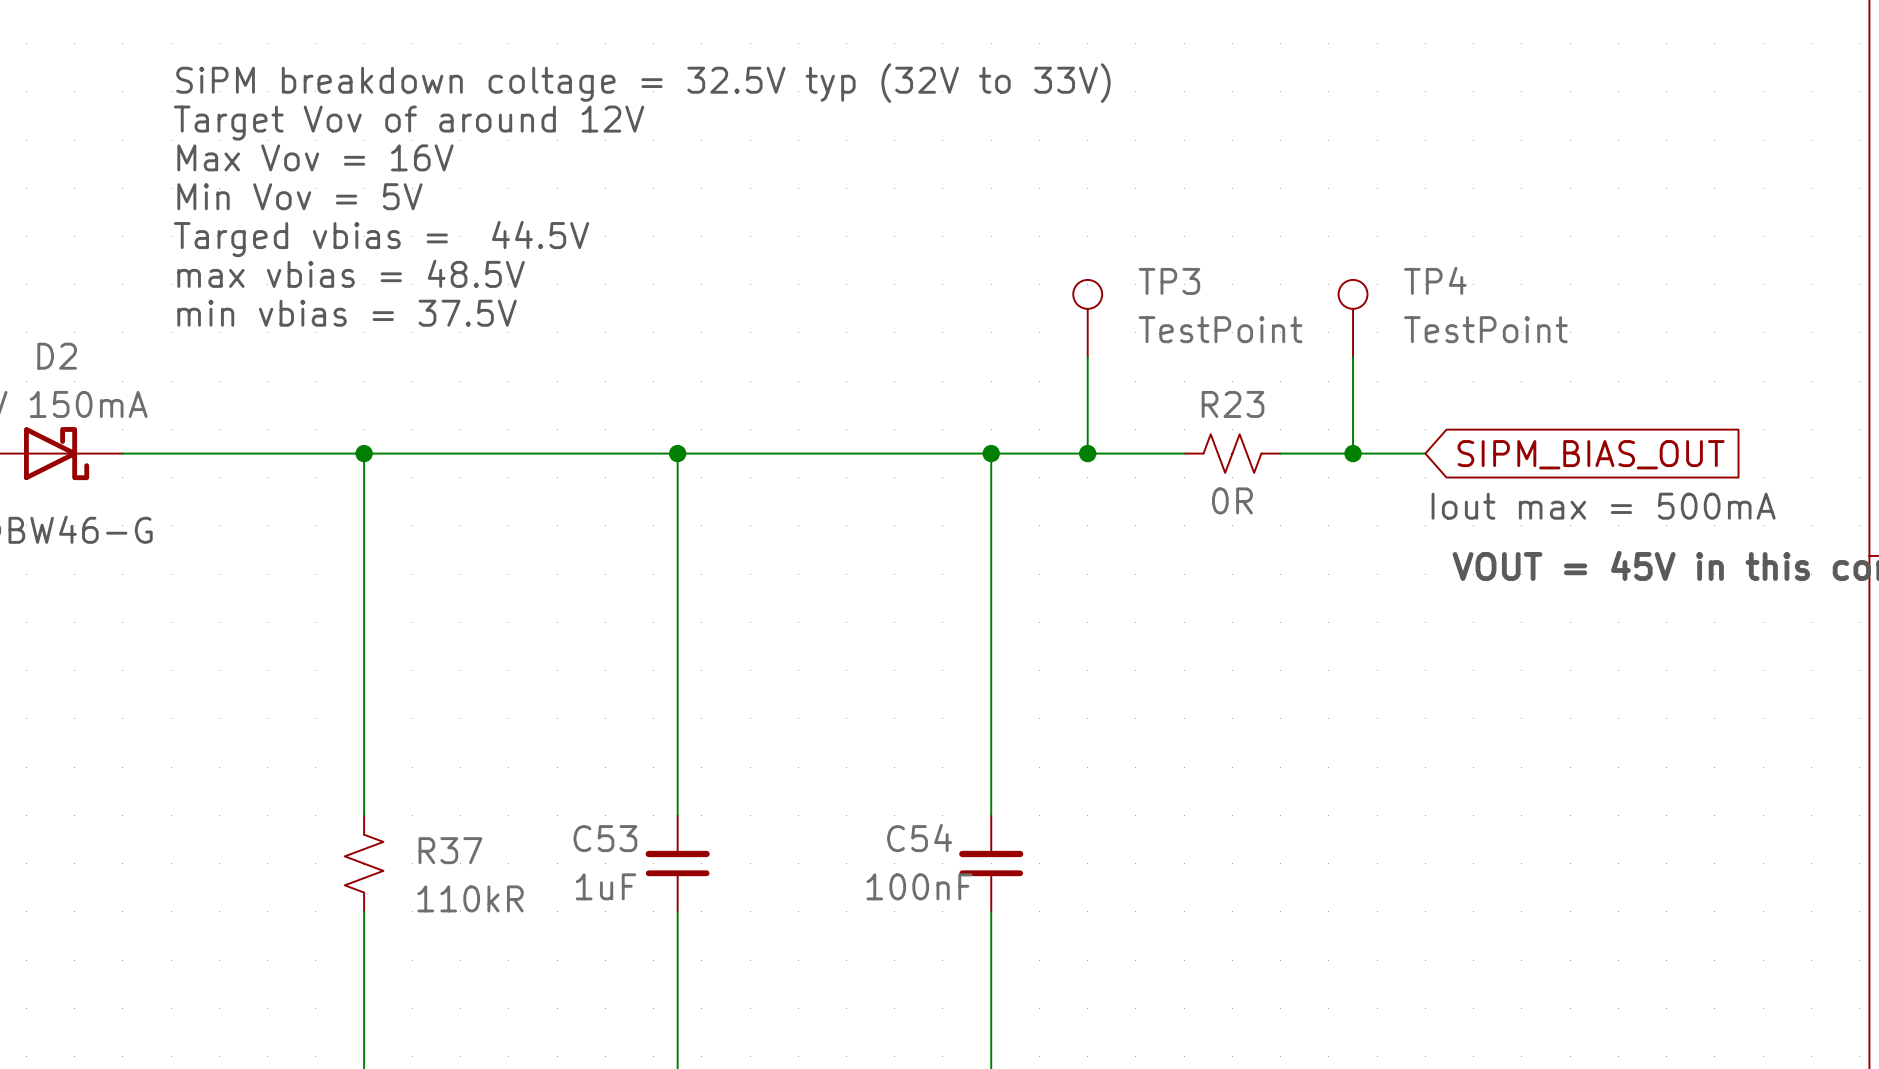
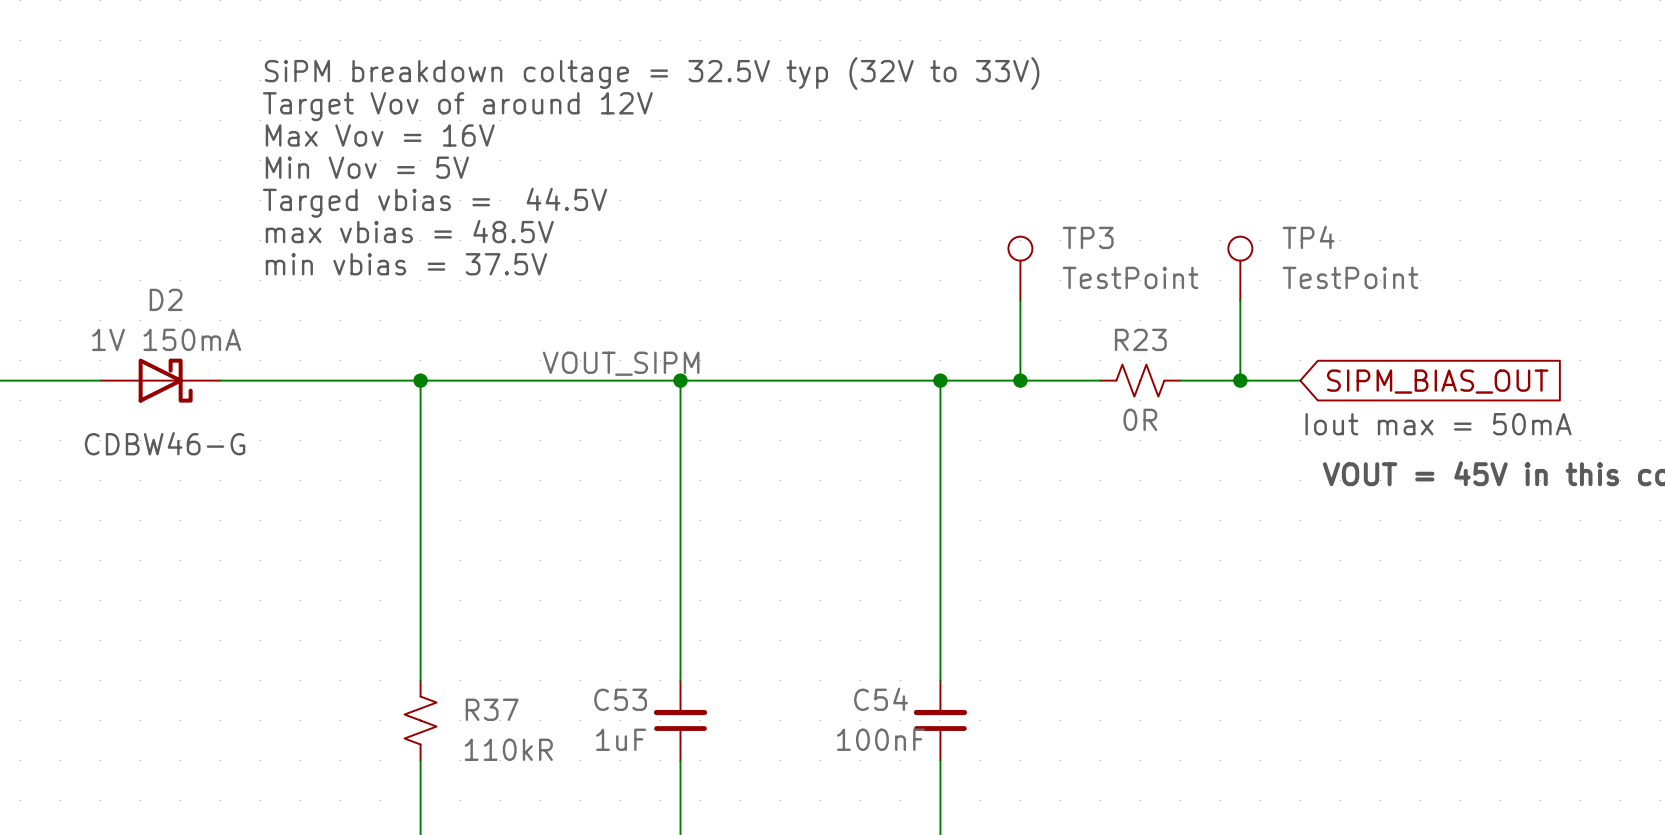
label: none -> VOUT_SIPM (621, 363)
text: Iout max = 500mA (1603, 506) -> Iout max = 50mA (1438, 424)

